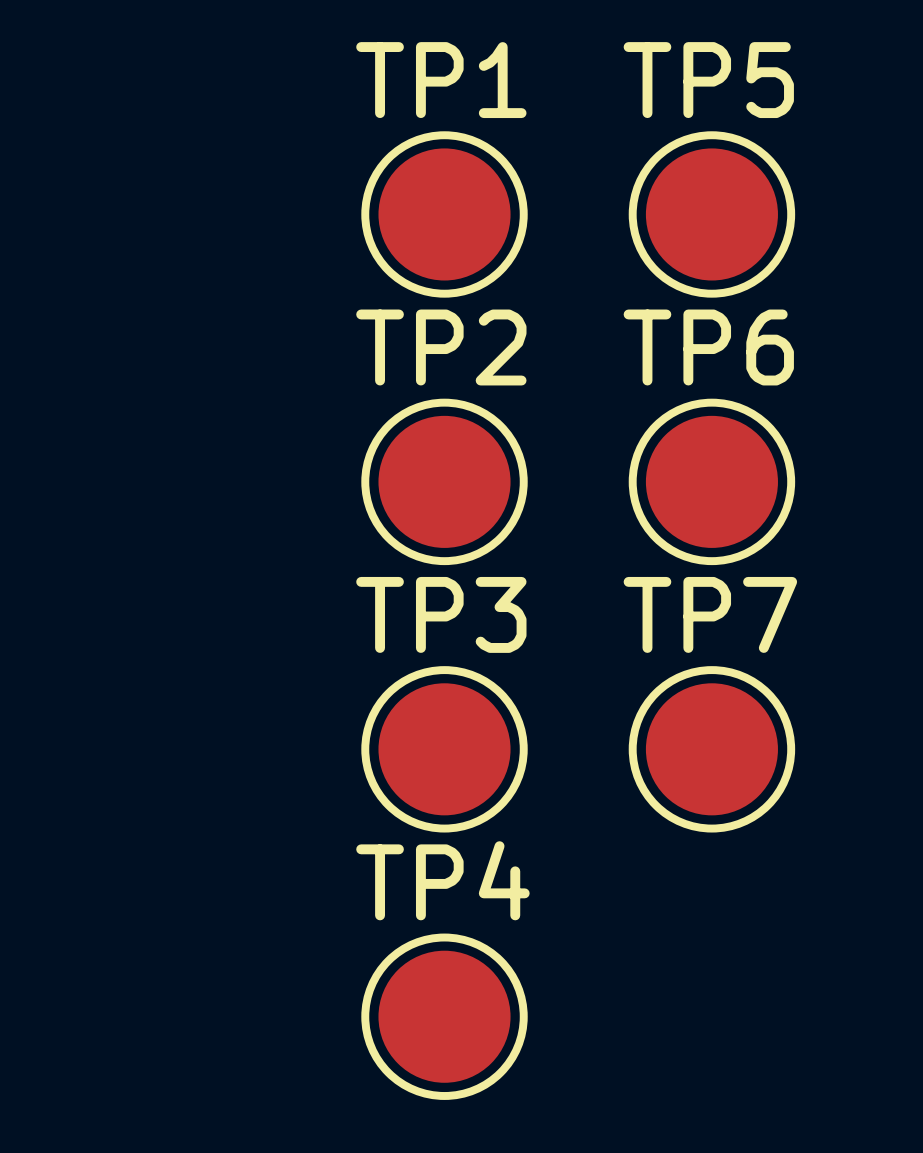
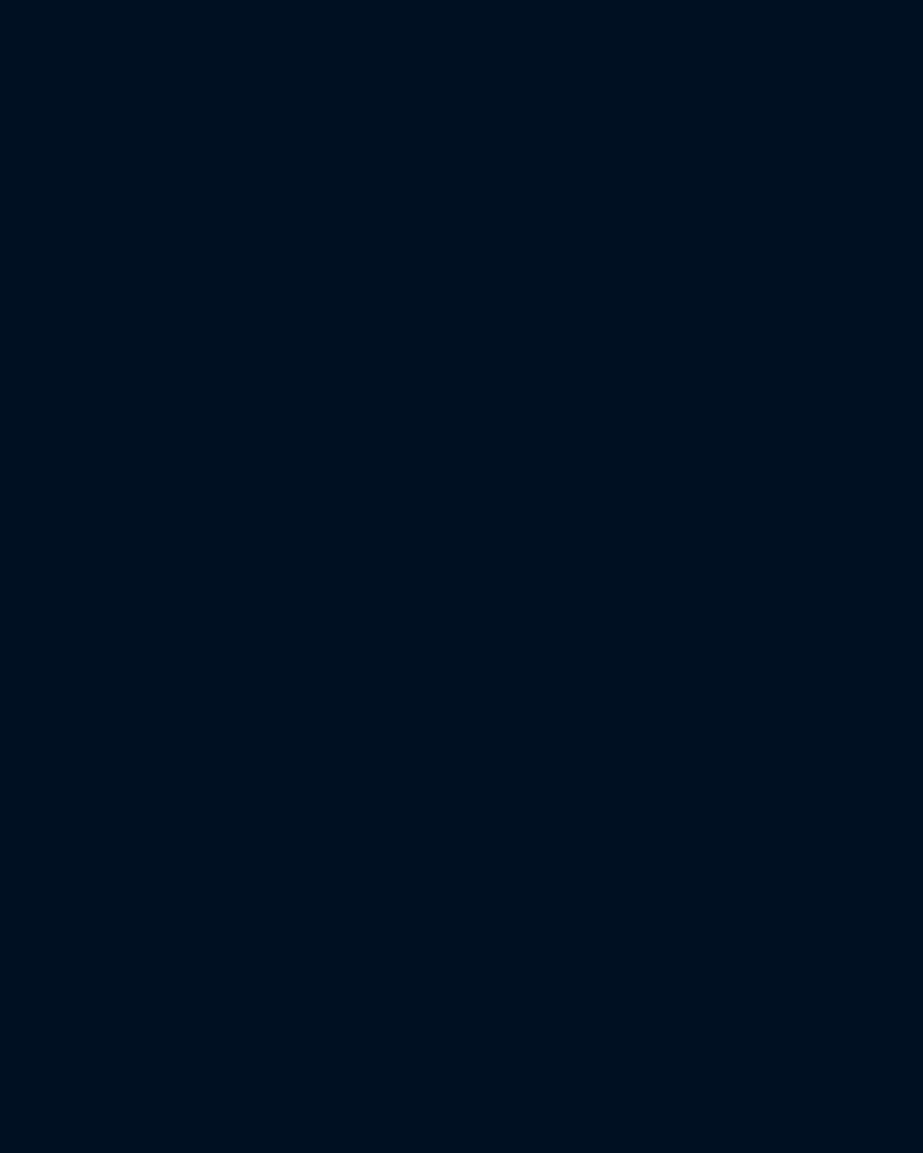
TP1: (444, 214) -> none
TP5: (711, 214) -> none
TP2: (444, 481) -> none
TP6: (711, 481) -> none
TP3: (444, 749) -> none
TP7: (711, 749) -> none
TP4: (444, 1016) -> none

